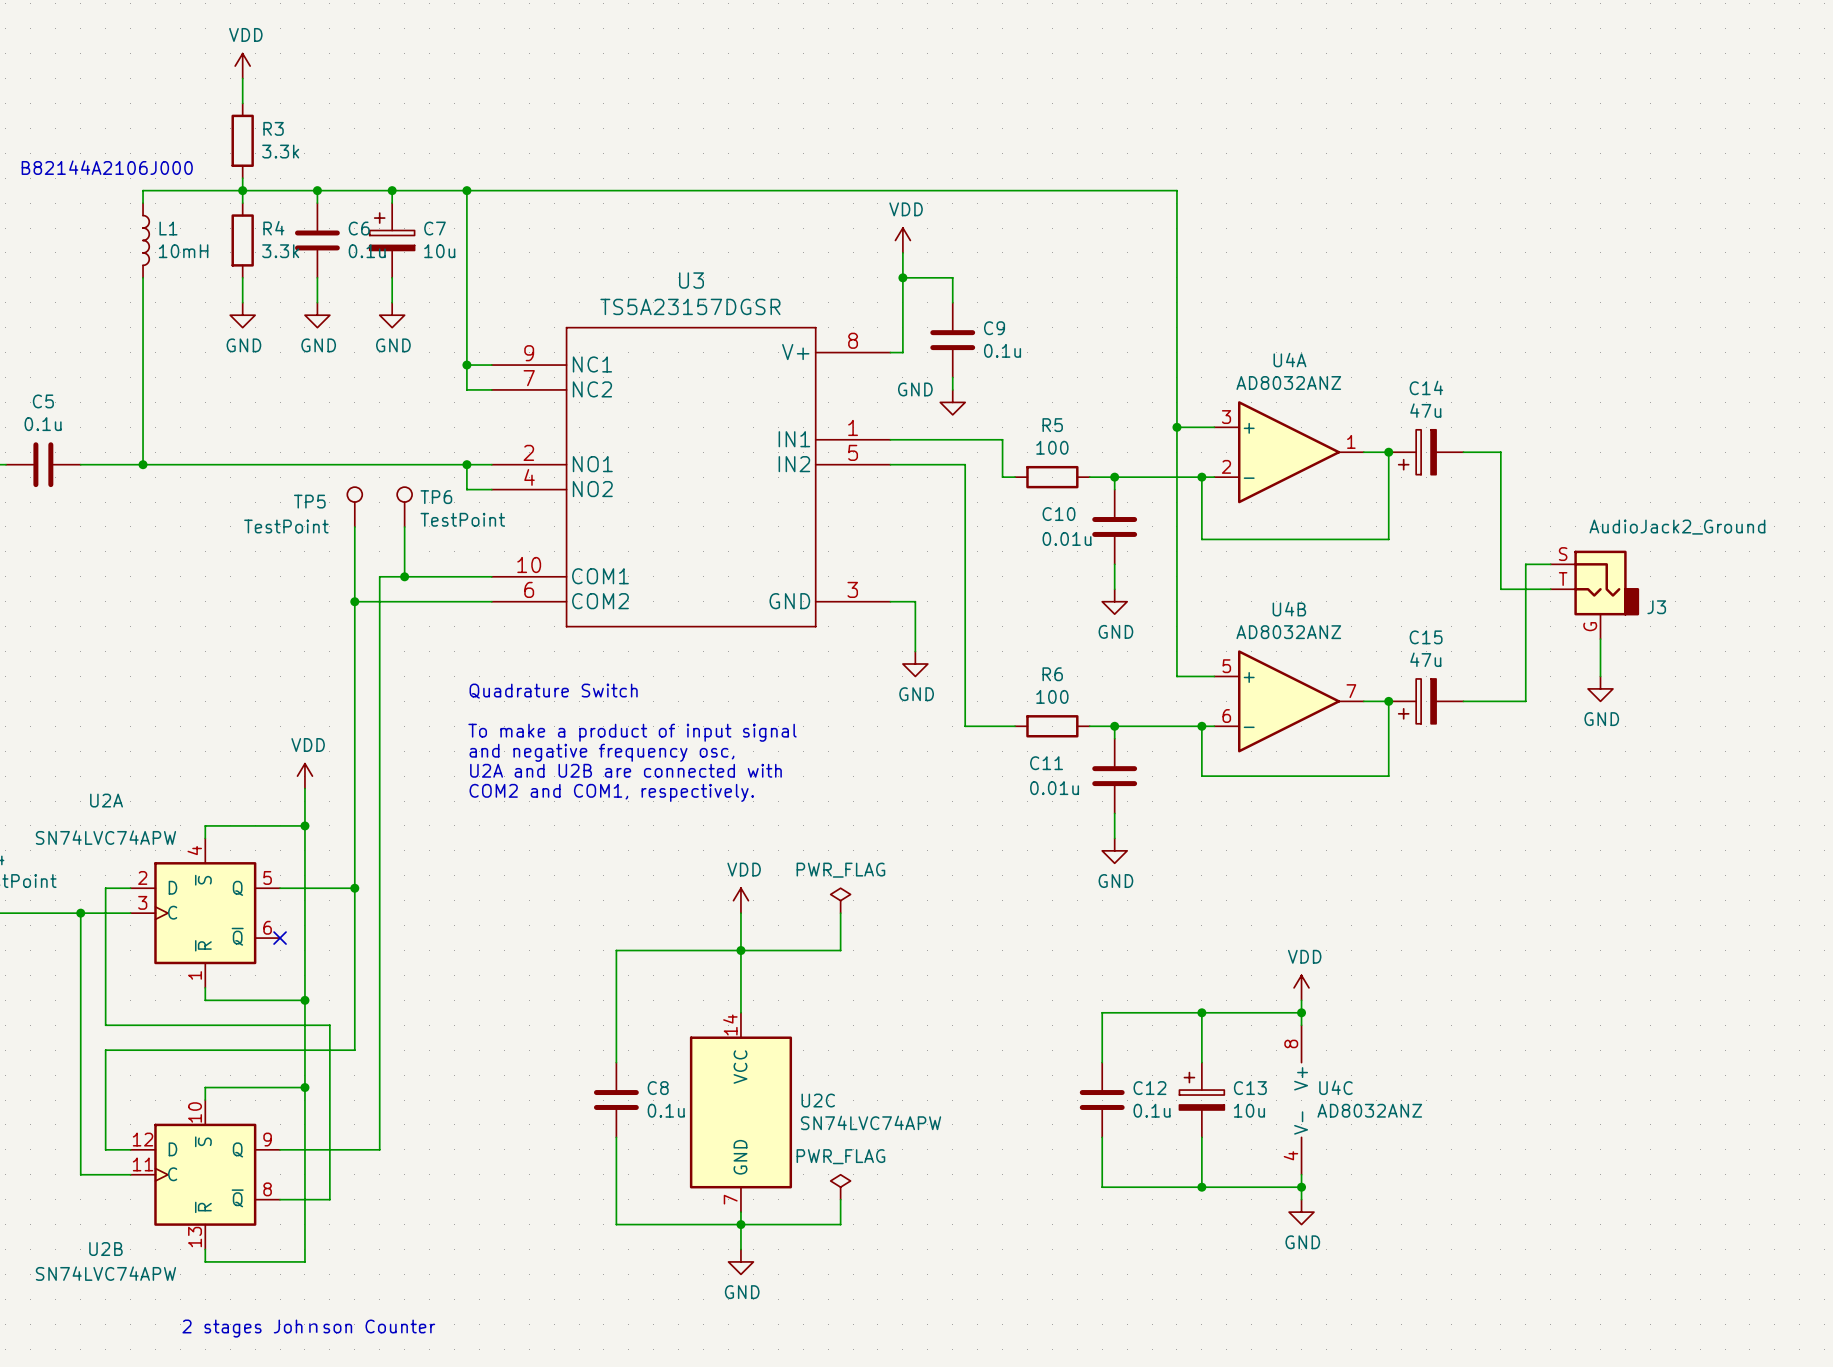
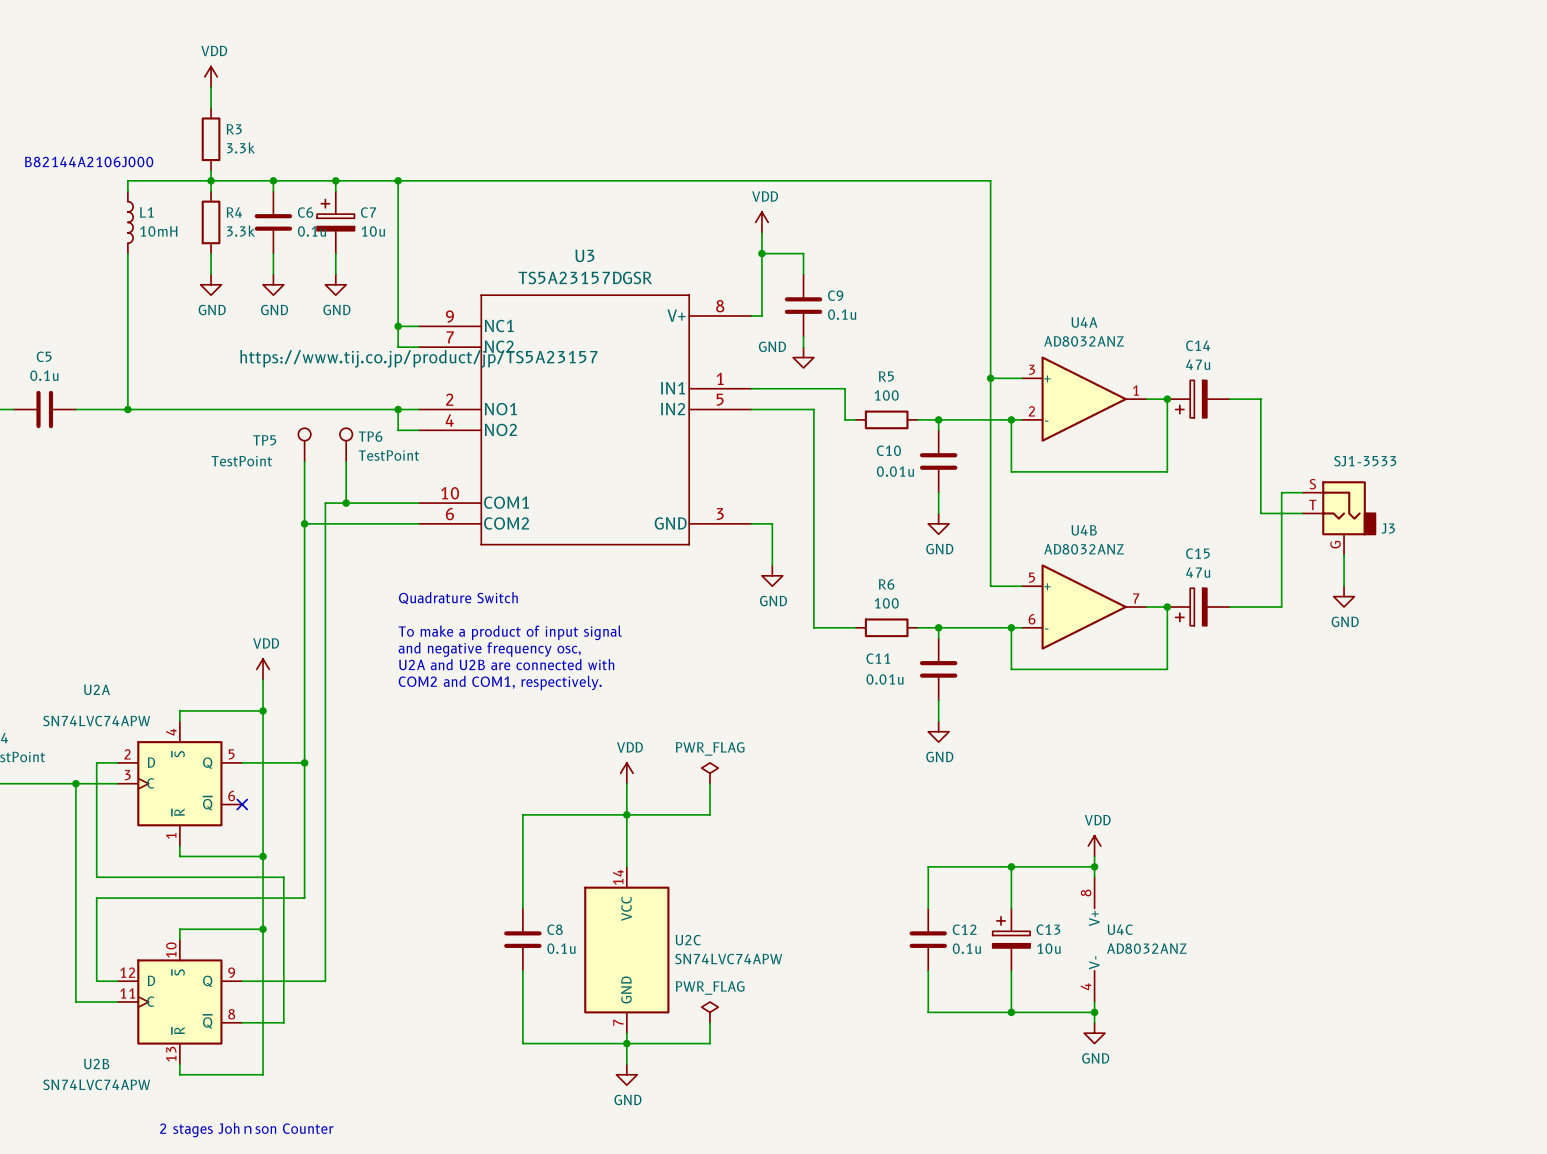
U3 text: none -> https://www.tij.co.jp/product/jp/TS5A23157 (418, 358)
J3 value: AudioJack2_Ground (1677, 527) -> SJ1-3533 (1365, 461)

